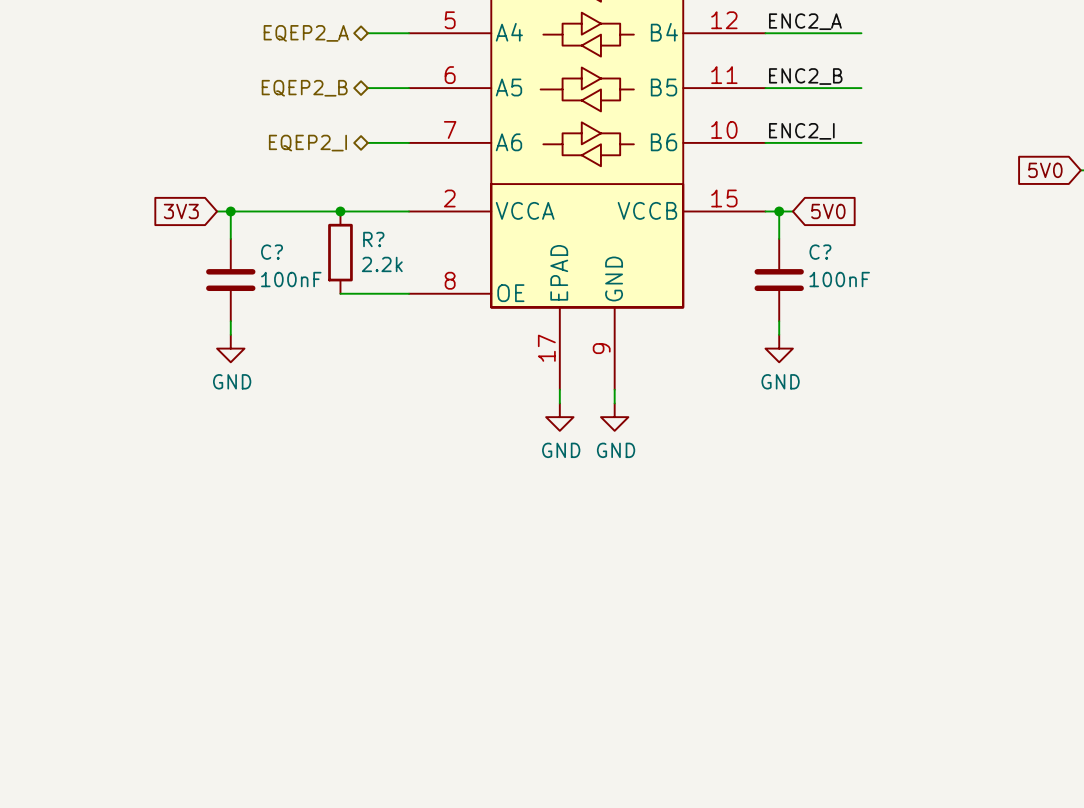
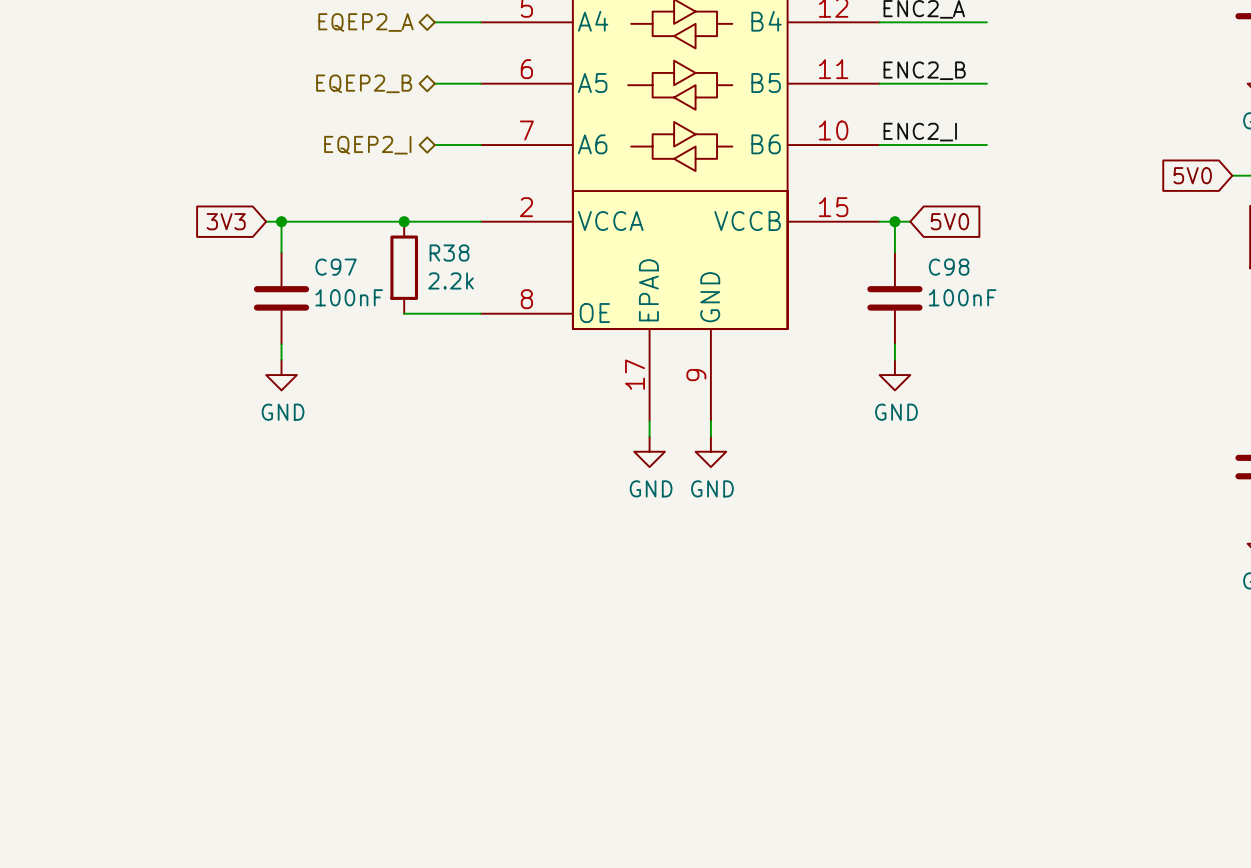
R? name: R? (373, 239) -> R38 (449, 253)
C? name: C? (272, 252) -> C97 (336, 267)
C? name: C? (820, 252) -> C98 (949, 267)

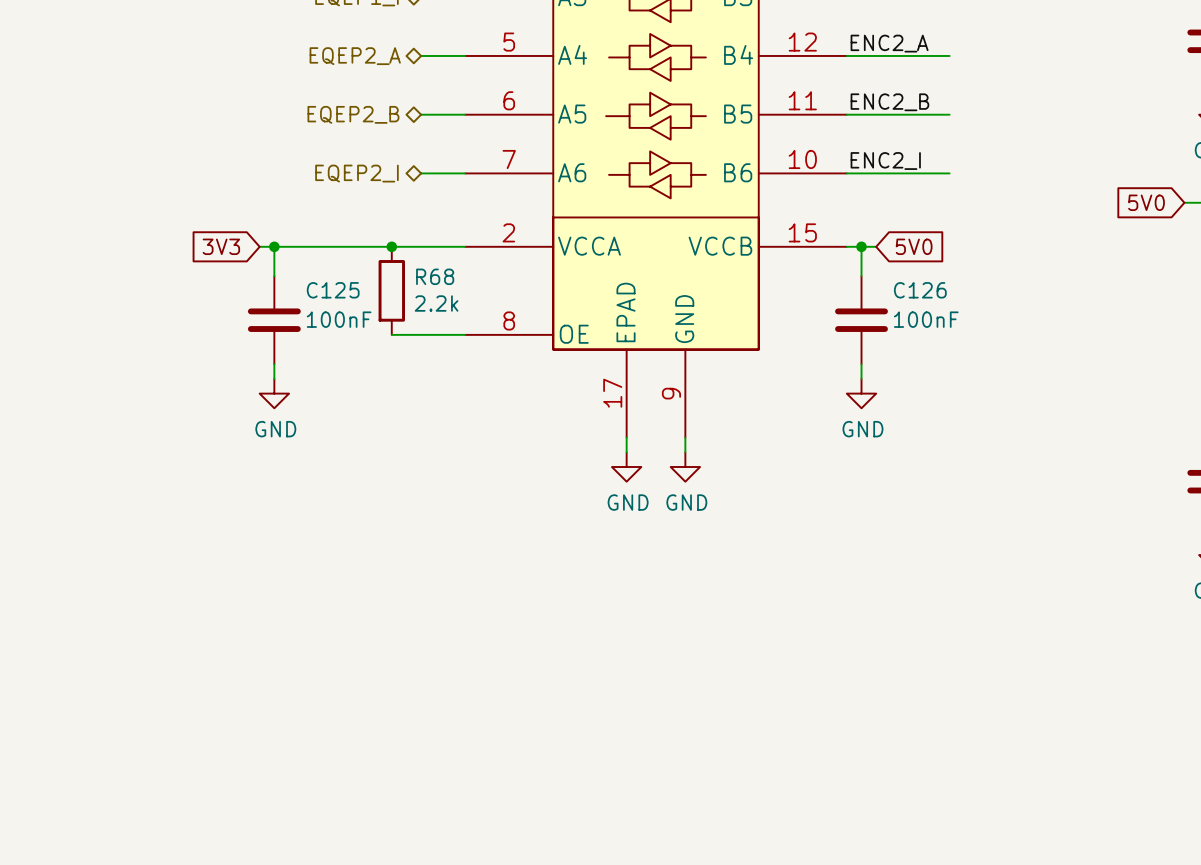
R38 name: R38 (449, 253) -> R68 (435, 276)
C97 name: C97 (336, 267) -> C125 (333, 290)
C98 name: C98 (949, 267) -> C126 (920, 290)

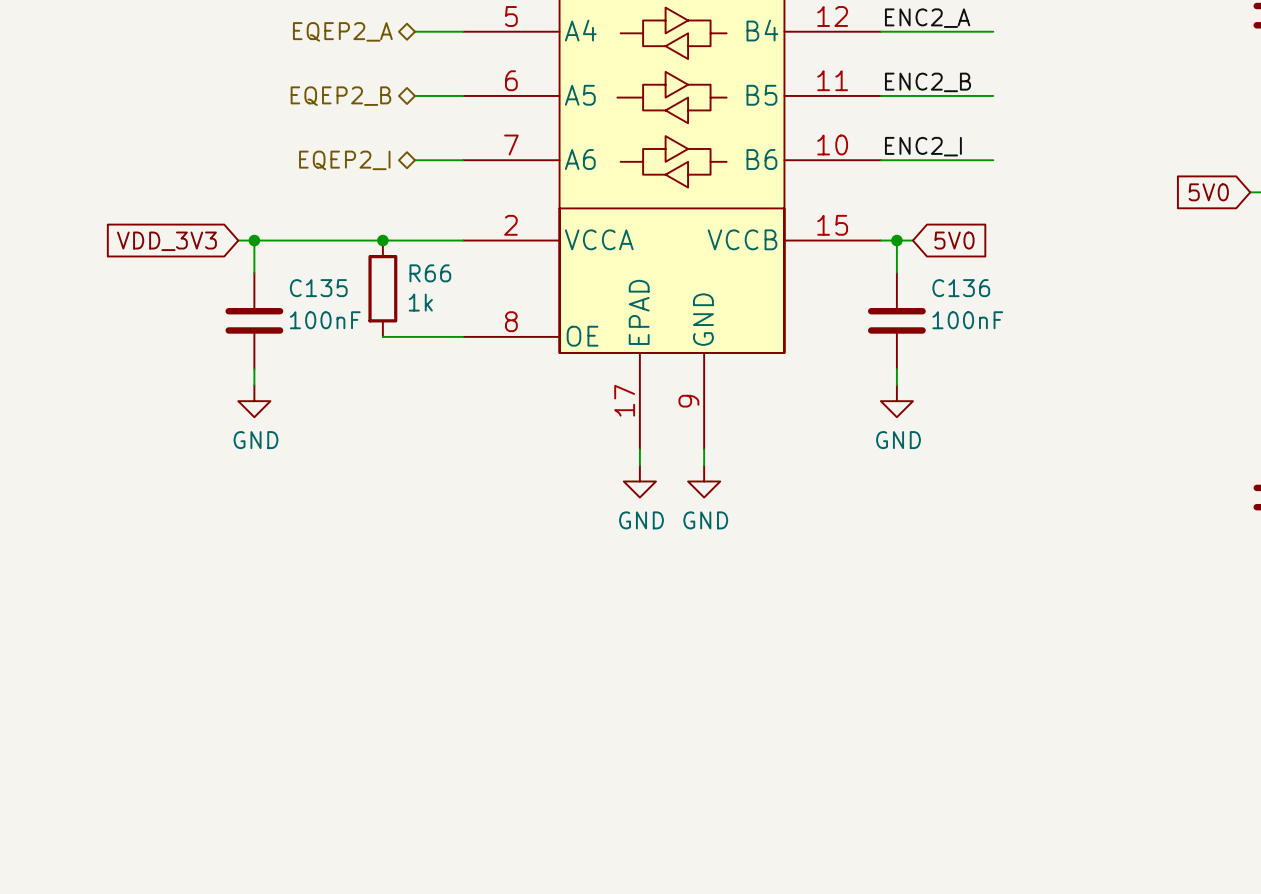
global label: 3V3 (221, 246) -> VDD_3V3 (166, 241)
R68 name: R68 (435, 276) -> R66 (430, 273)
C125 name: C125 (333, 290) -> C135 (318, 288)
C126 name: C126 (920, 290) -> C136 (961, 288)
R68 value: 2.2k (436, 303) -> 1k (420, 302)

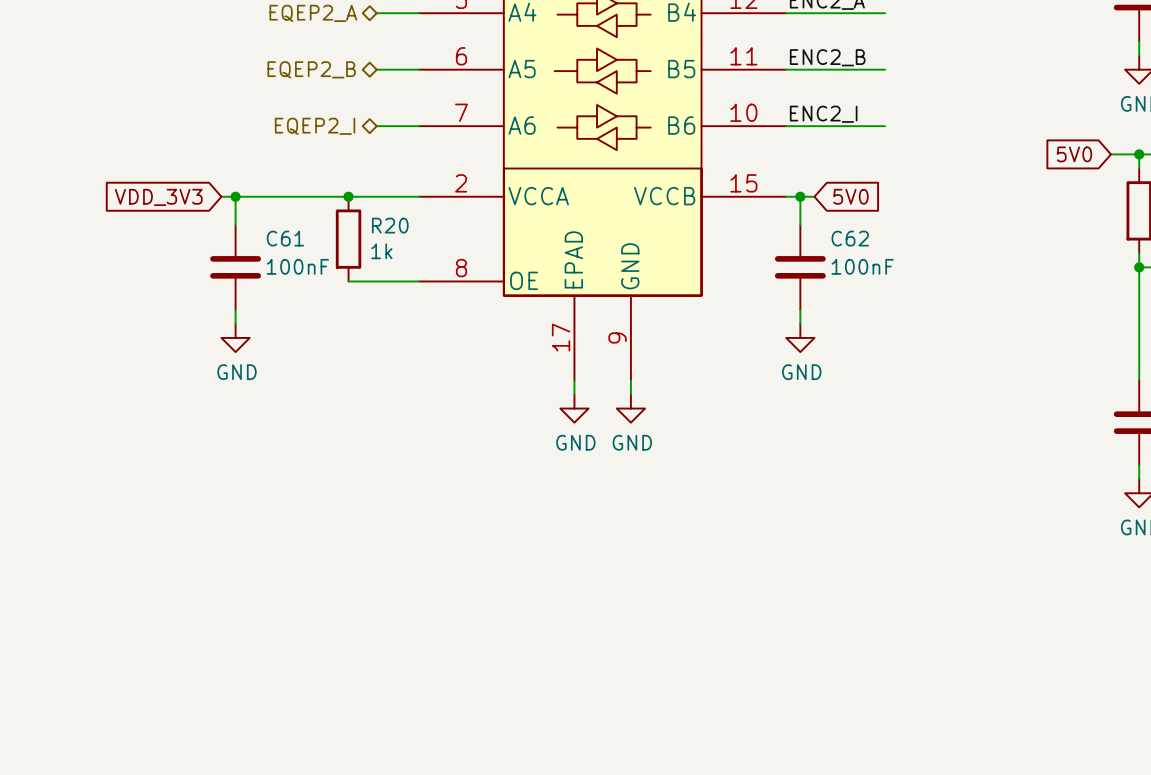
R66 name: R66 (430, 273) -> R20 (390, 225)
C135 name: C135 (318, 288) -> C61 (285, 238)
C136 name: C136 (961, 288) -> C62 (850, 238)

